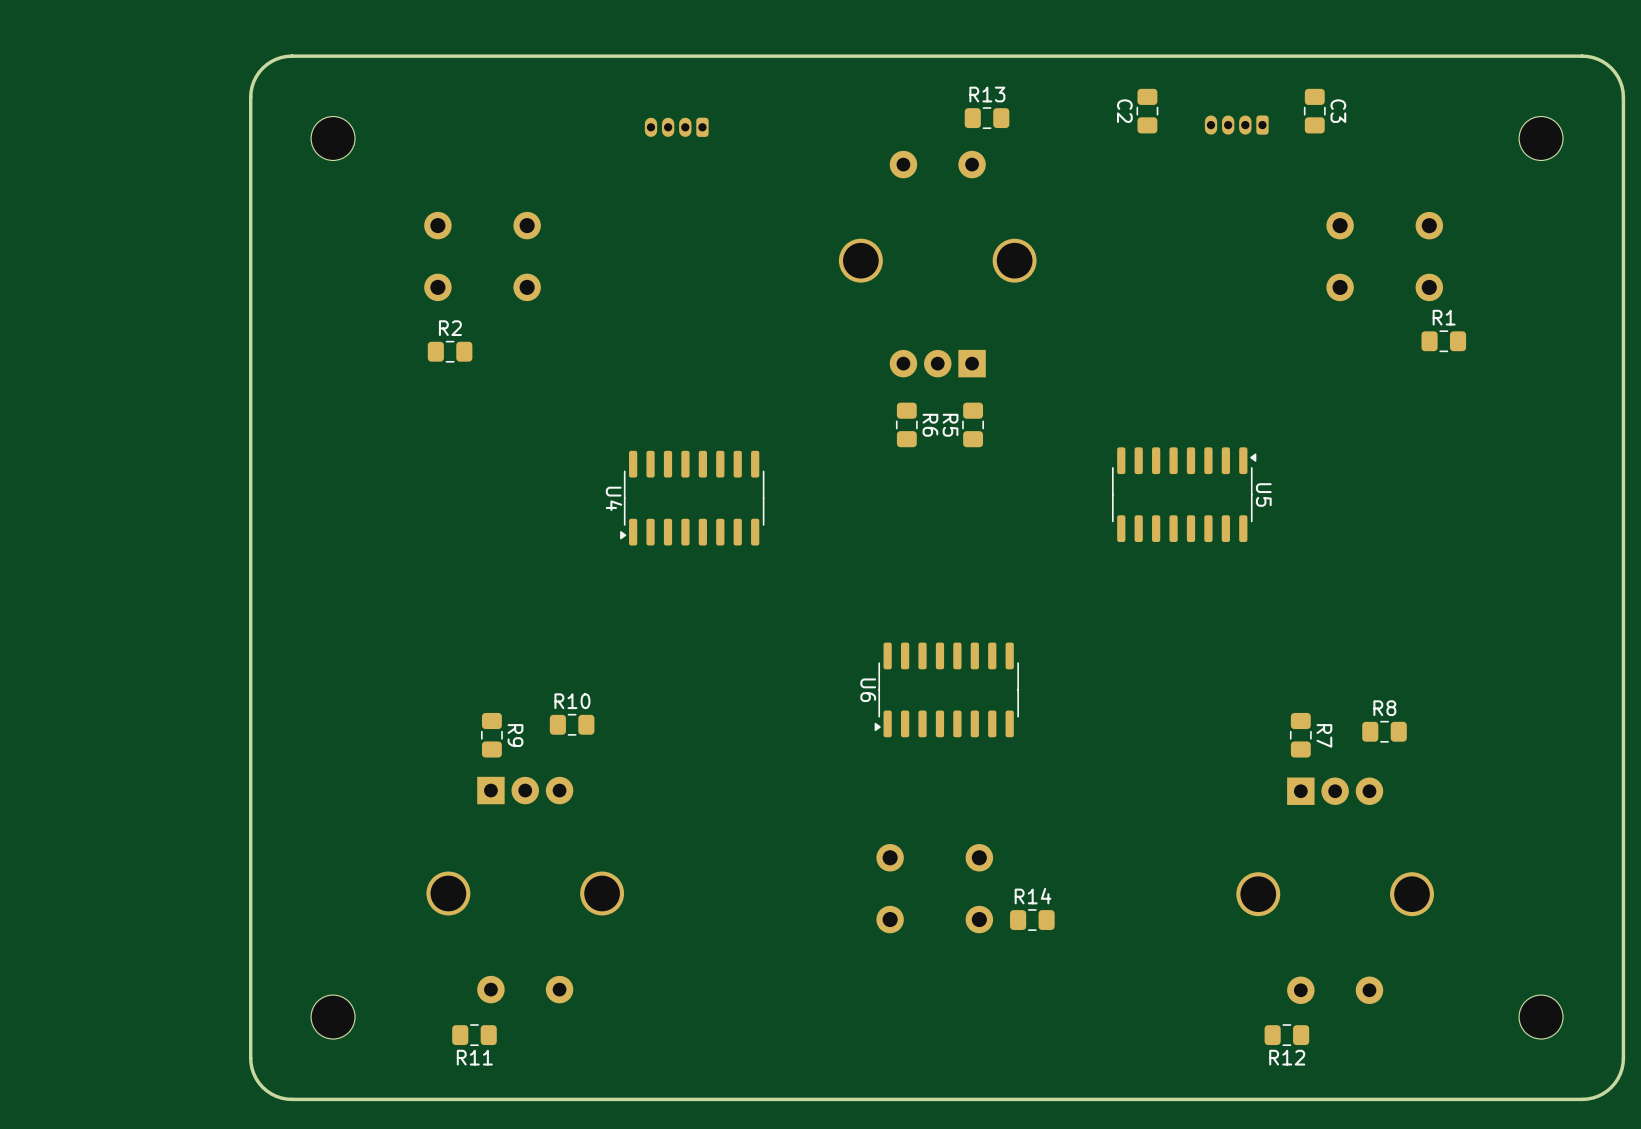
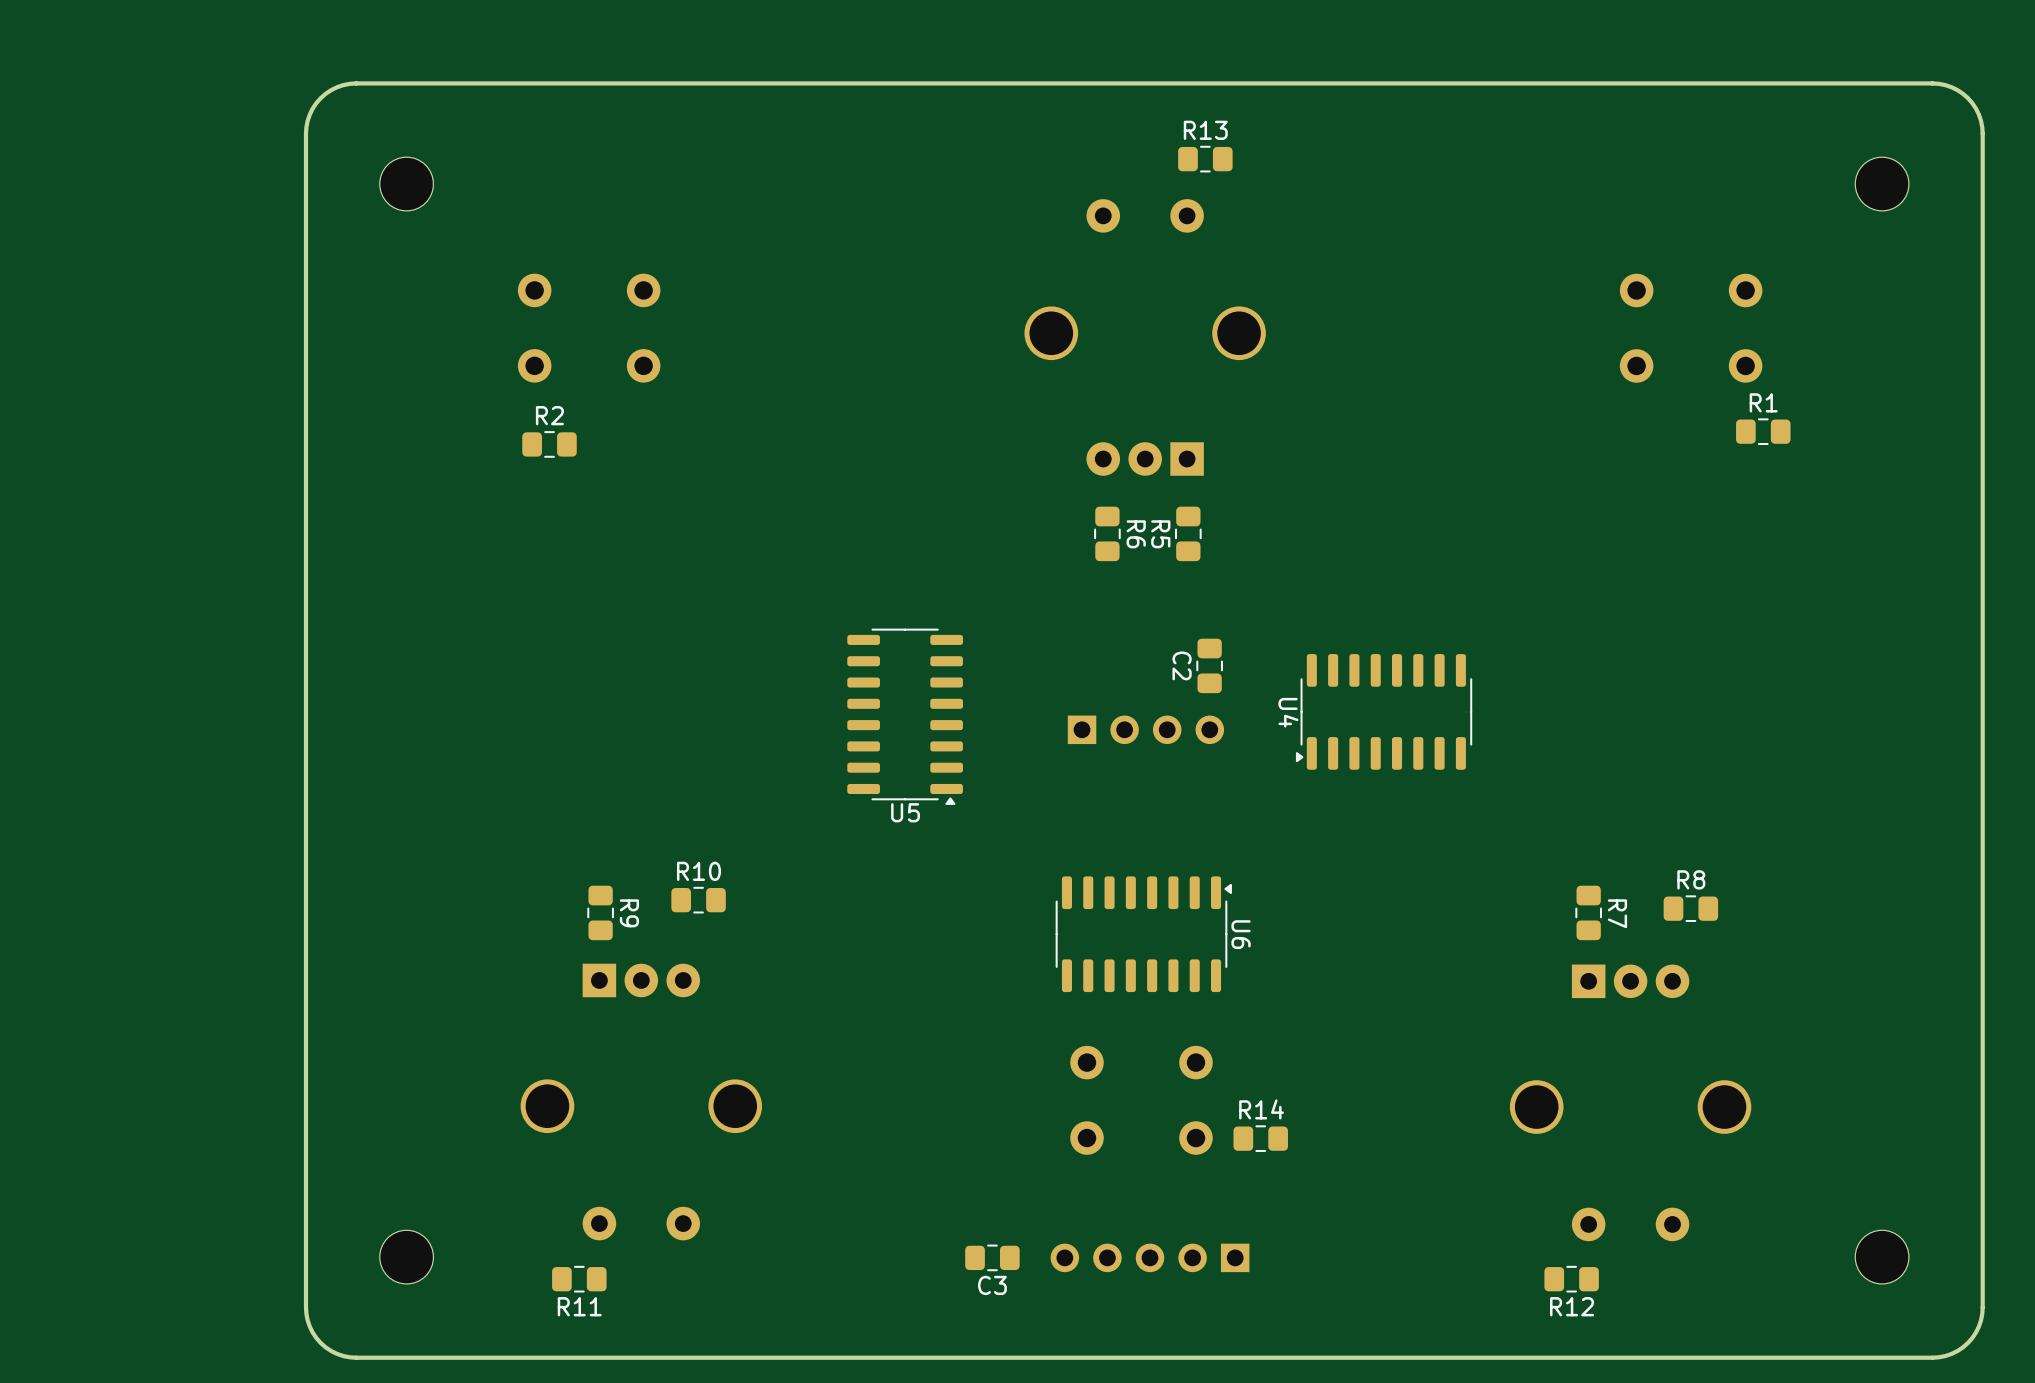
C2 position: (1147, 111) -> (1209, 665)
C3 rotation: 0° (1314, 111) -> 90° clockwise (992, 1257)
C3 position: (1314, 111) -> (992, 1257)
part: (1236, 125) -> none
part: (676, 127) -> none
U5 rotation: 0° (1184, 494) -> 90° clockwise (905, 716)
U5 position: (1184, 494) -> (905, 716)
U4 position: (692, 498) -> (1384, 711)
part: none -> (1145, 729)
U6 rotation: 0° (946, 689) -> 180° (1143, 934)
part: none -> (1150, 1257)

